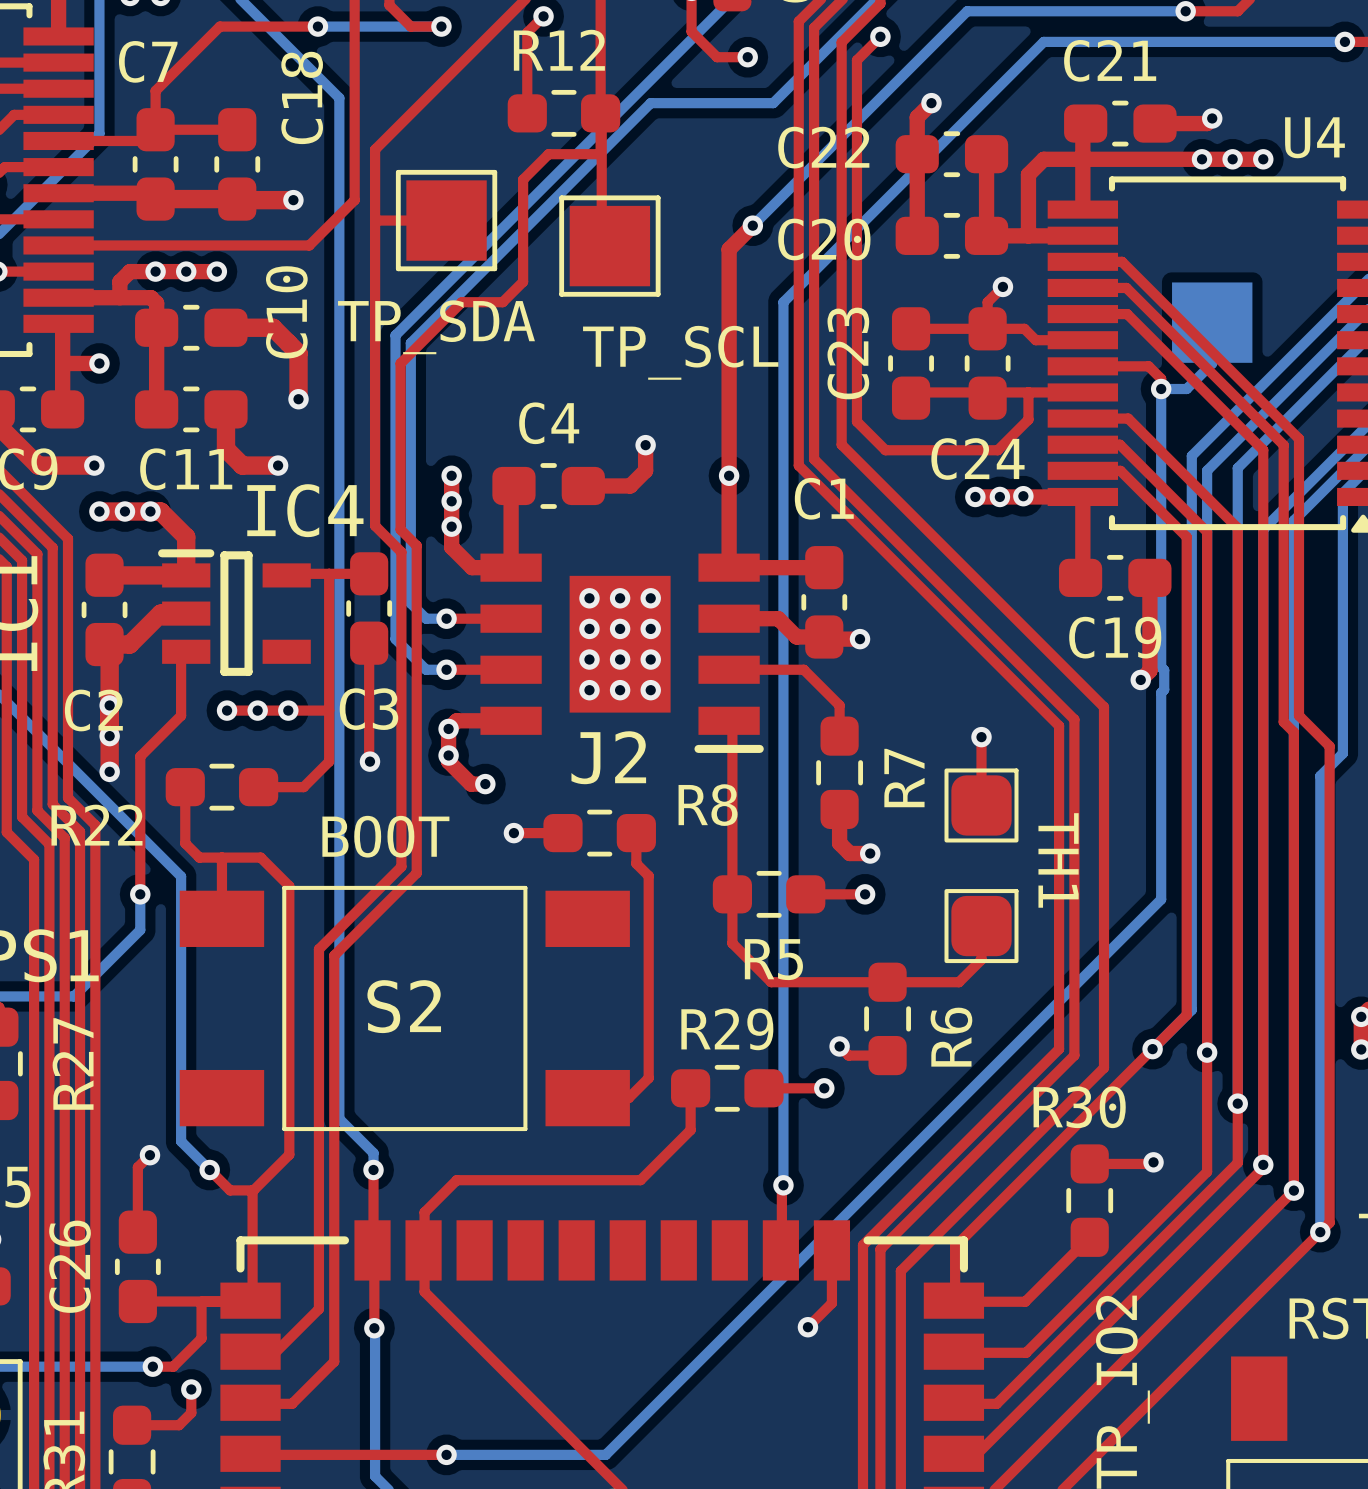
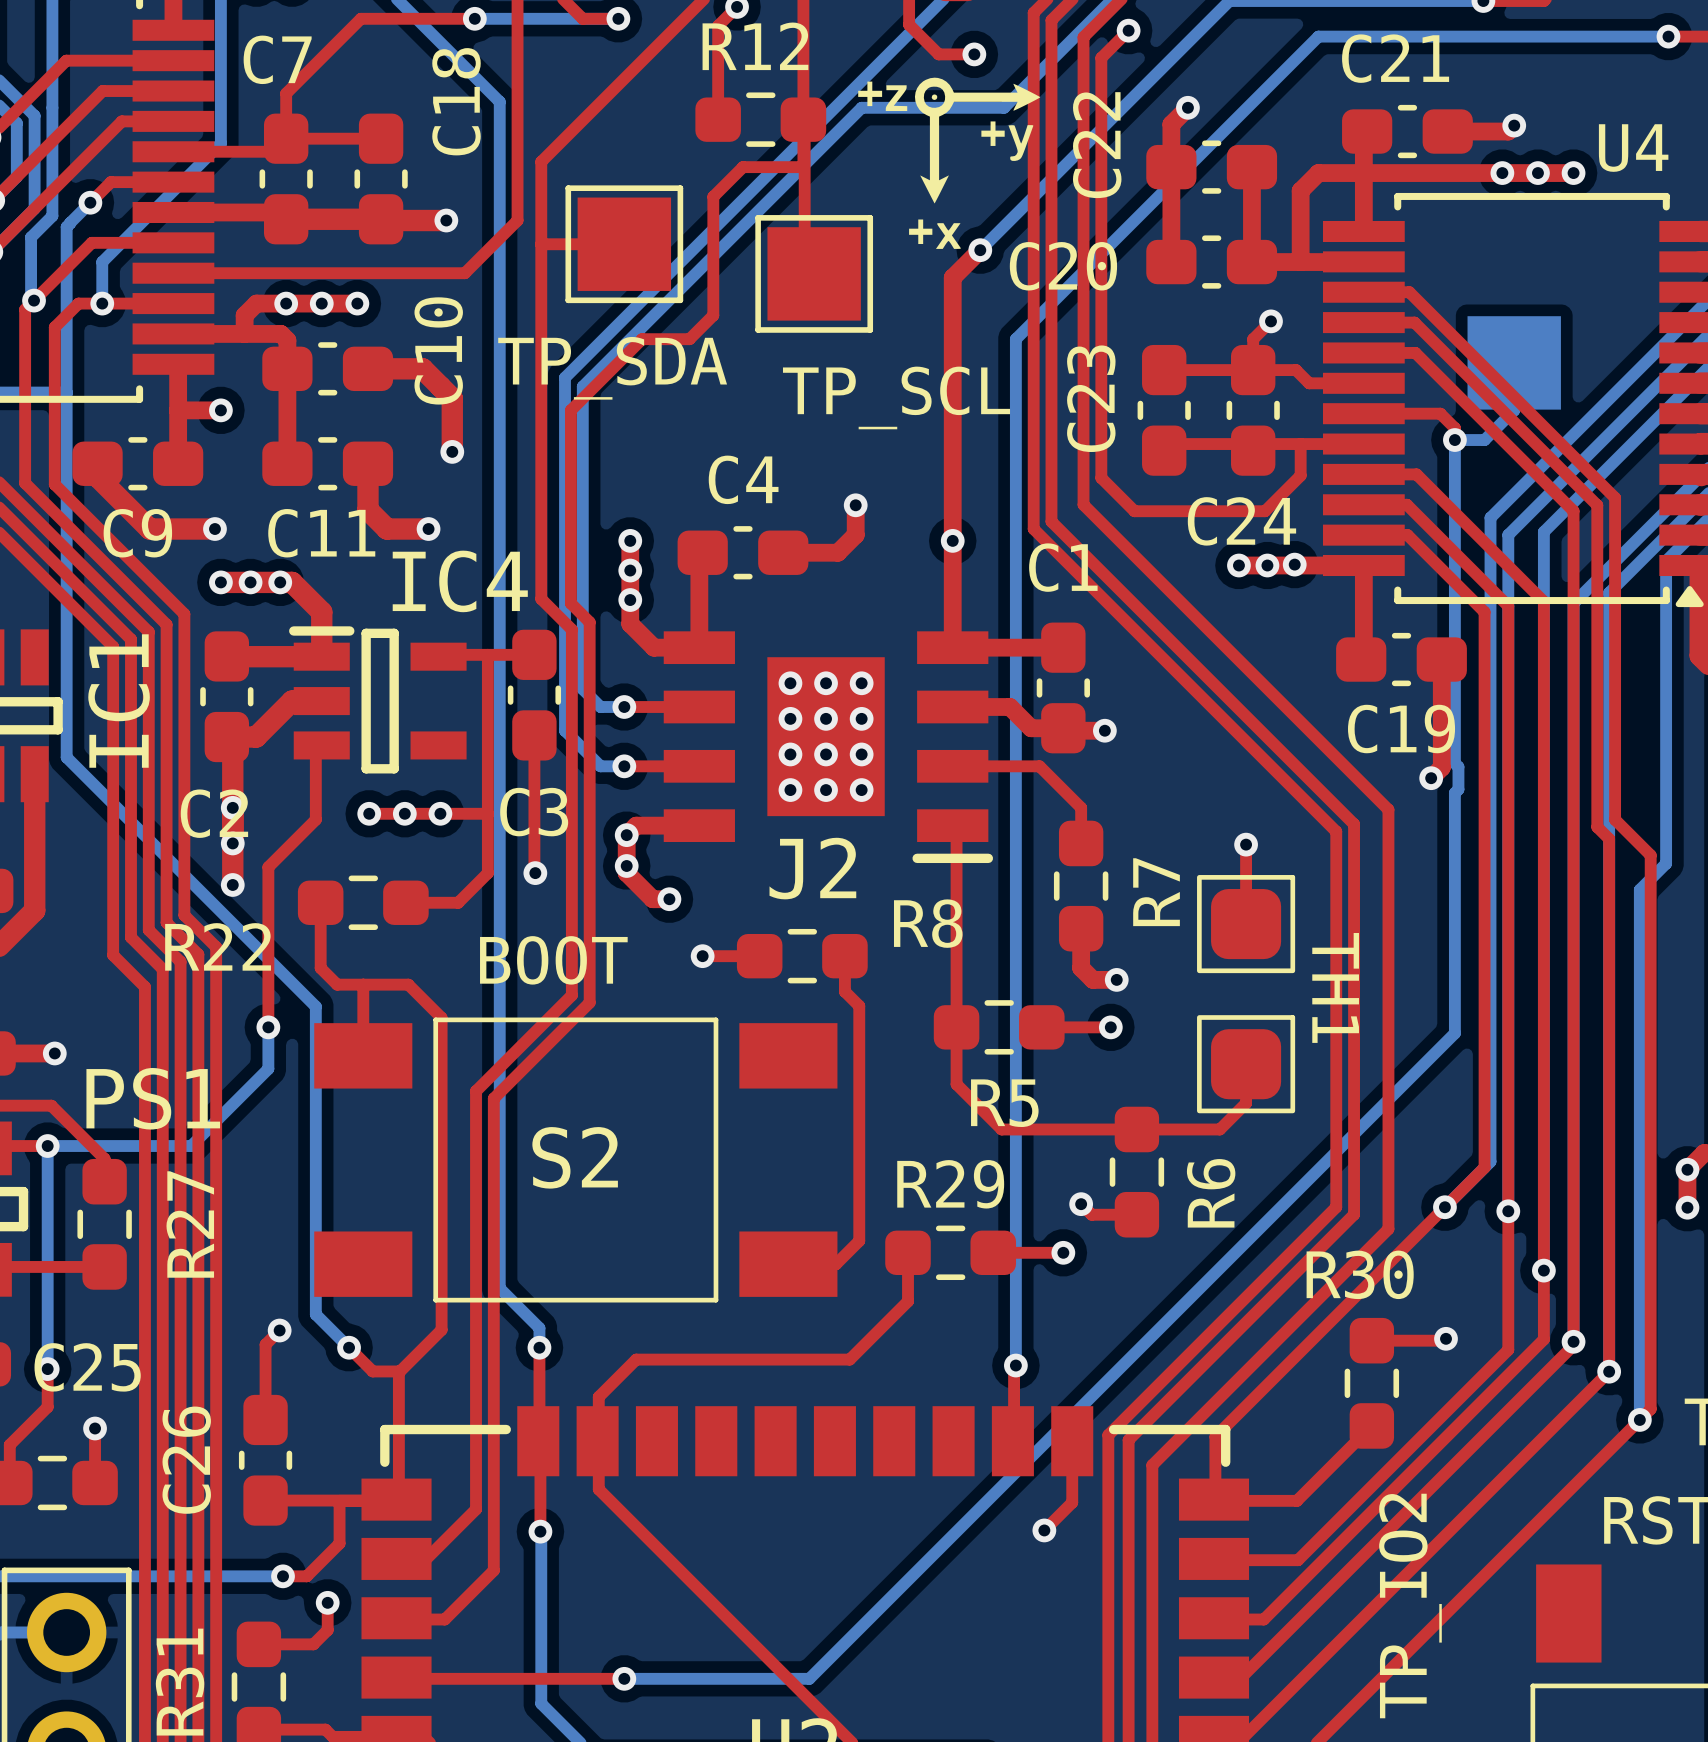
drawing: none -> [858, 77, 1041, 249]
C22 name rotation: 0° (823, 147) -> 90° counterclockwise (1097, 145)
TH1 footprint: [944, 768, 1019, 964] -> [1197, 875, 1296, 1114]

